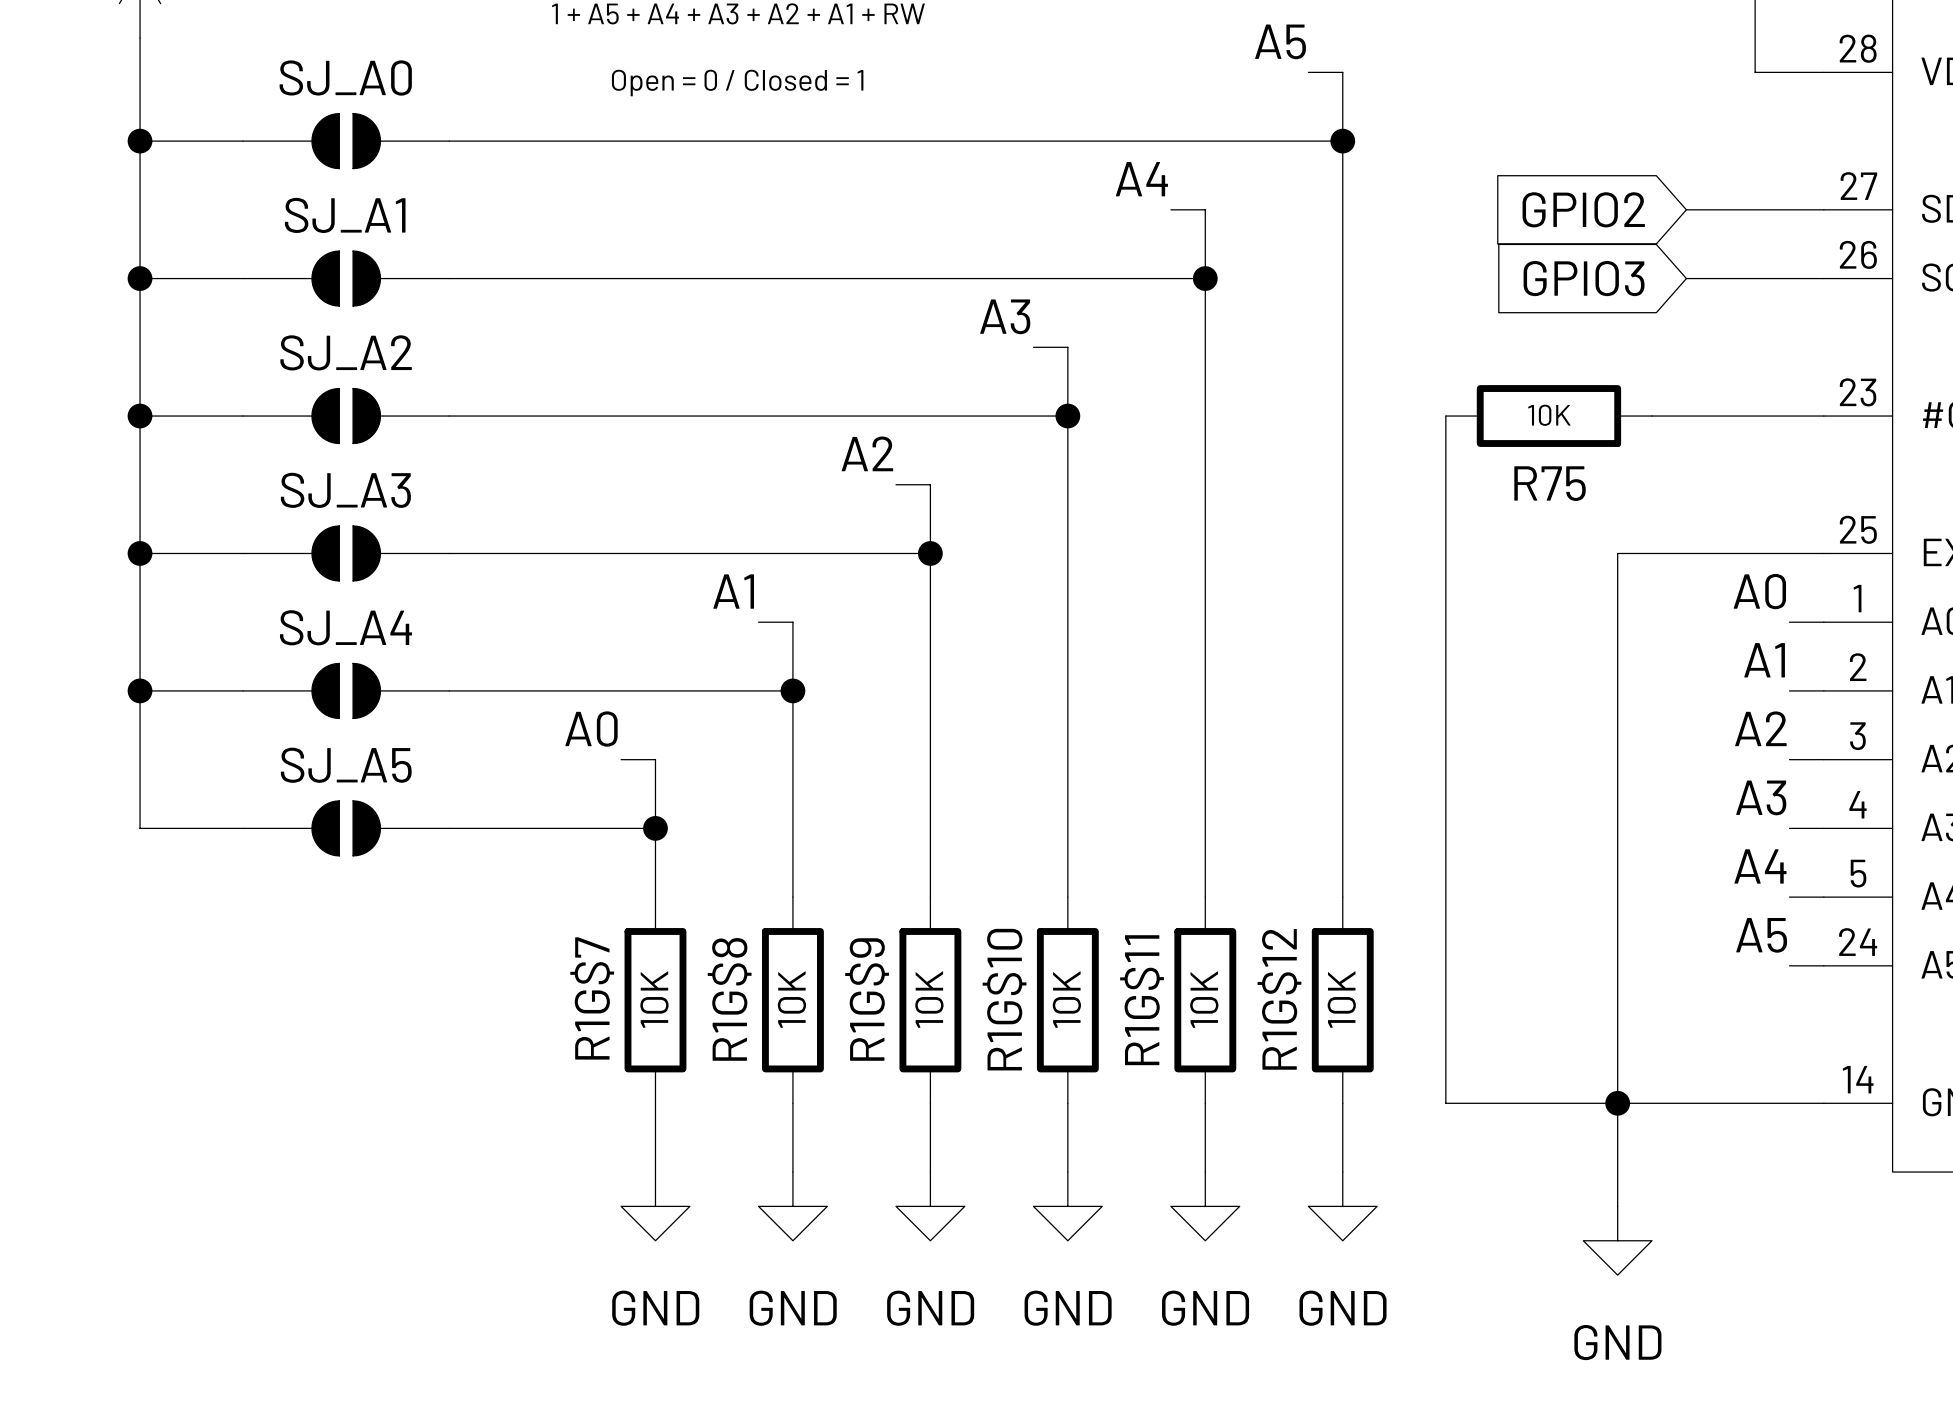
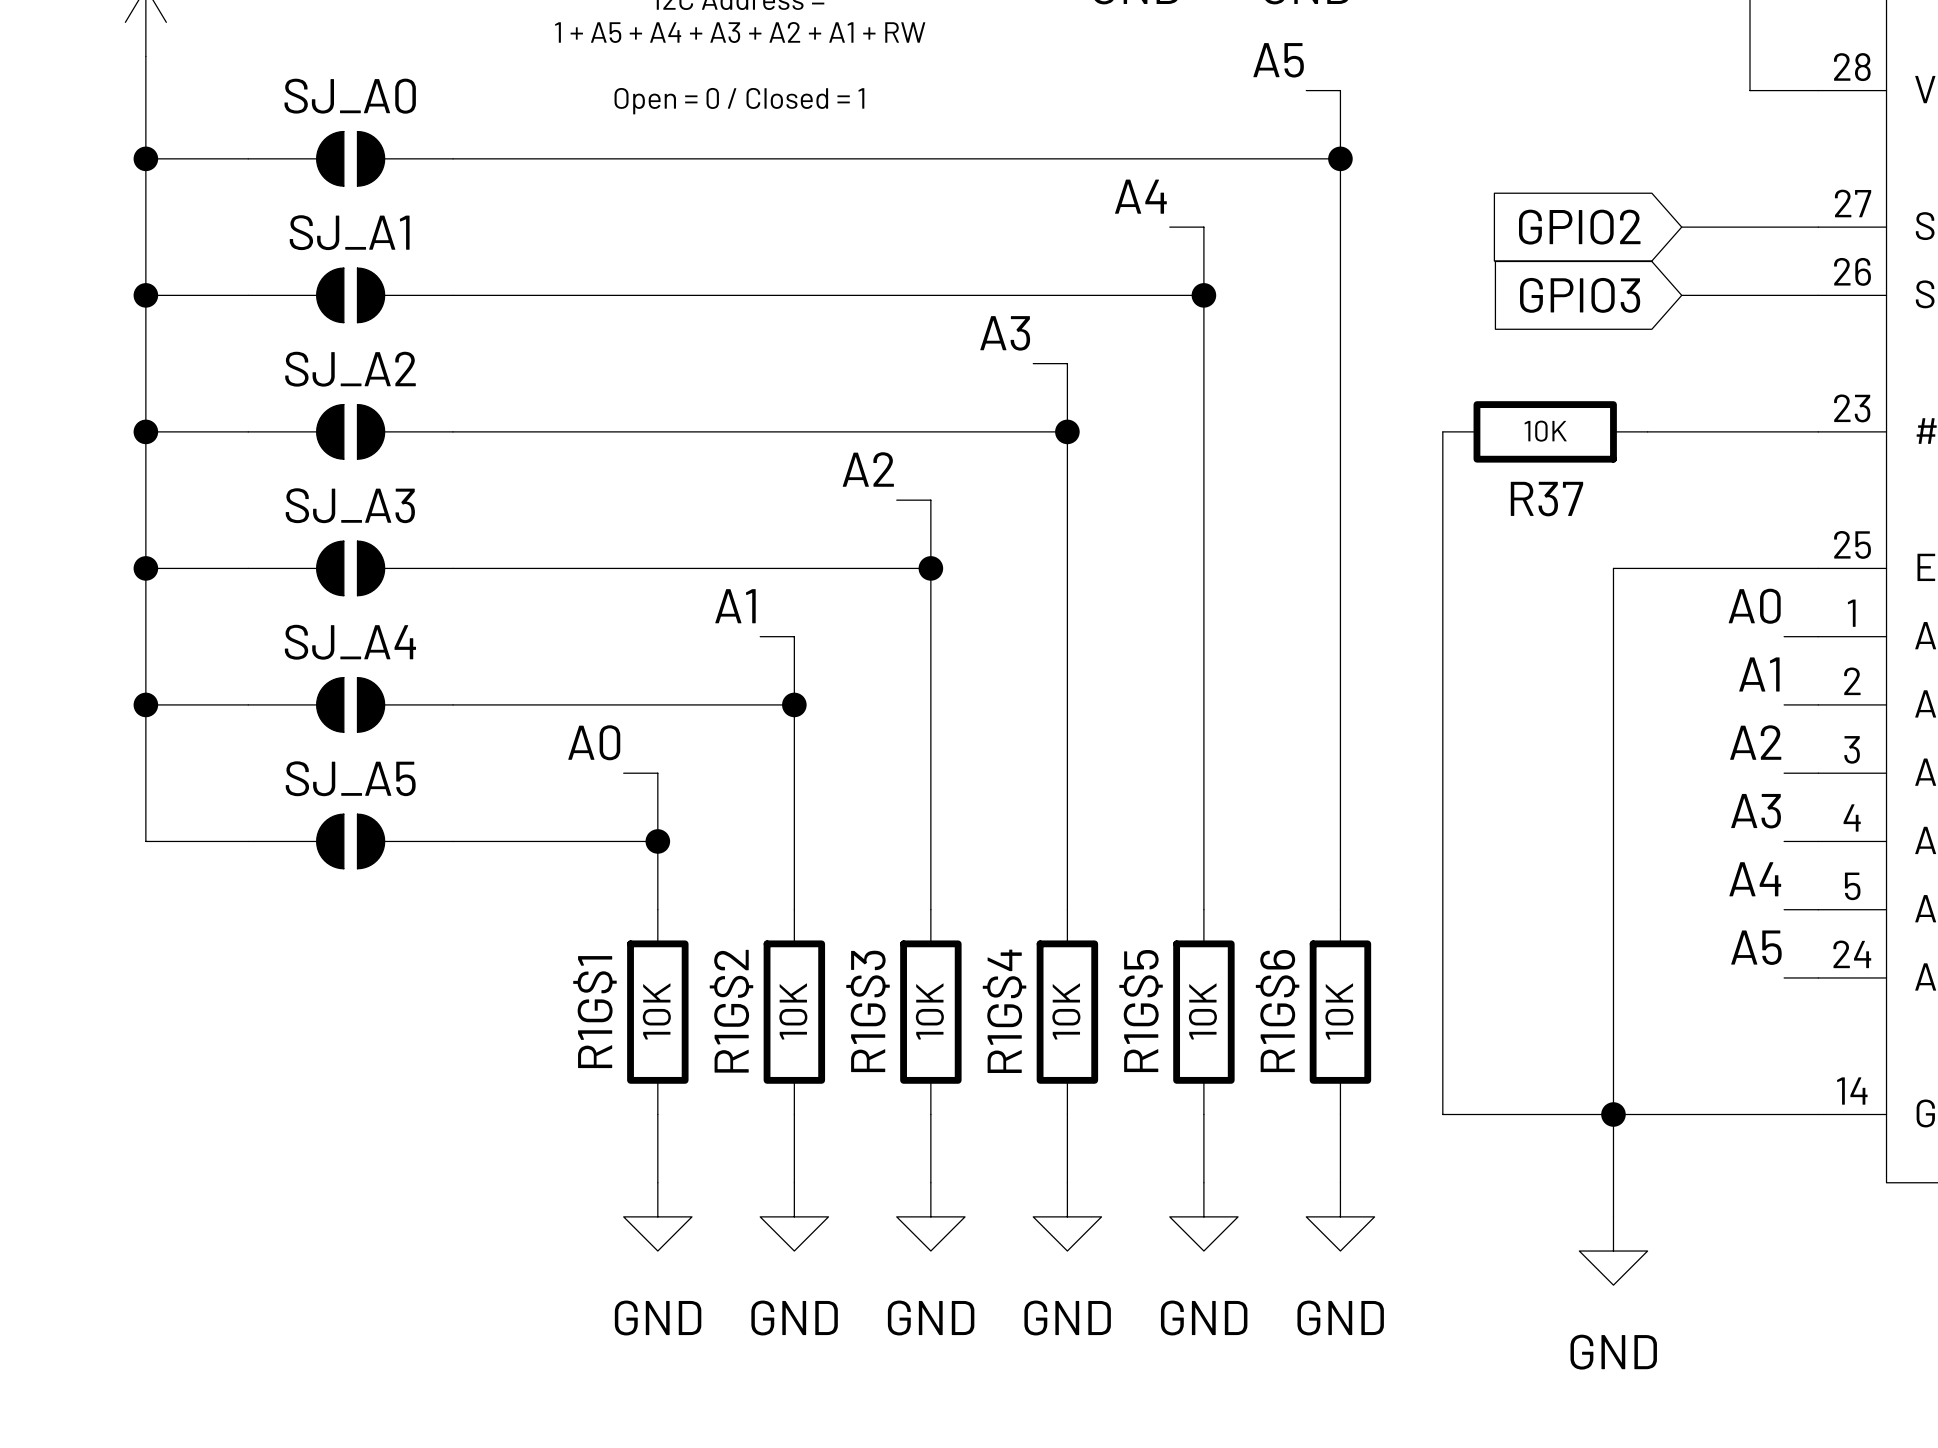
R75 name: R75 (1550, 483) -> R37 (1546, 499)
R1G$7 name: R1G$7 (592, 998) -> R1G$1 (594, 1012)
R1G$8 name: R1G$8 (729, 999) -> R1G$2 (731, 1011)
R1G$9 name: R1G$9 (867, 999) -> R1G$3 (868, 1011)
R1G$10 name: R1G$10 (1004, 999) -> R1G$4 (1004, 1011)
R1G$12 name: R1G$12 (1279, 999) -> R1G$6 (1277, 1011)
R1G$11 name: R1G$11 (1142, 1000) -> R1G$5 (1141, 1011)

